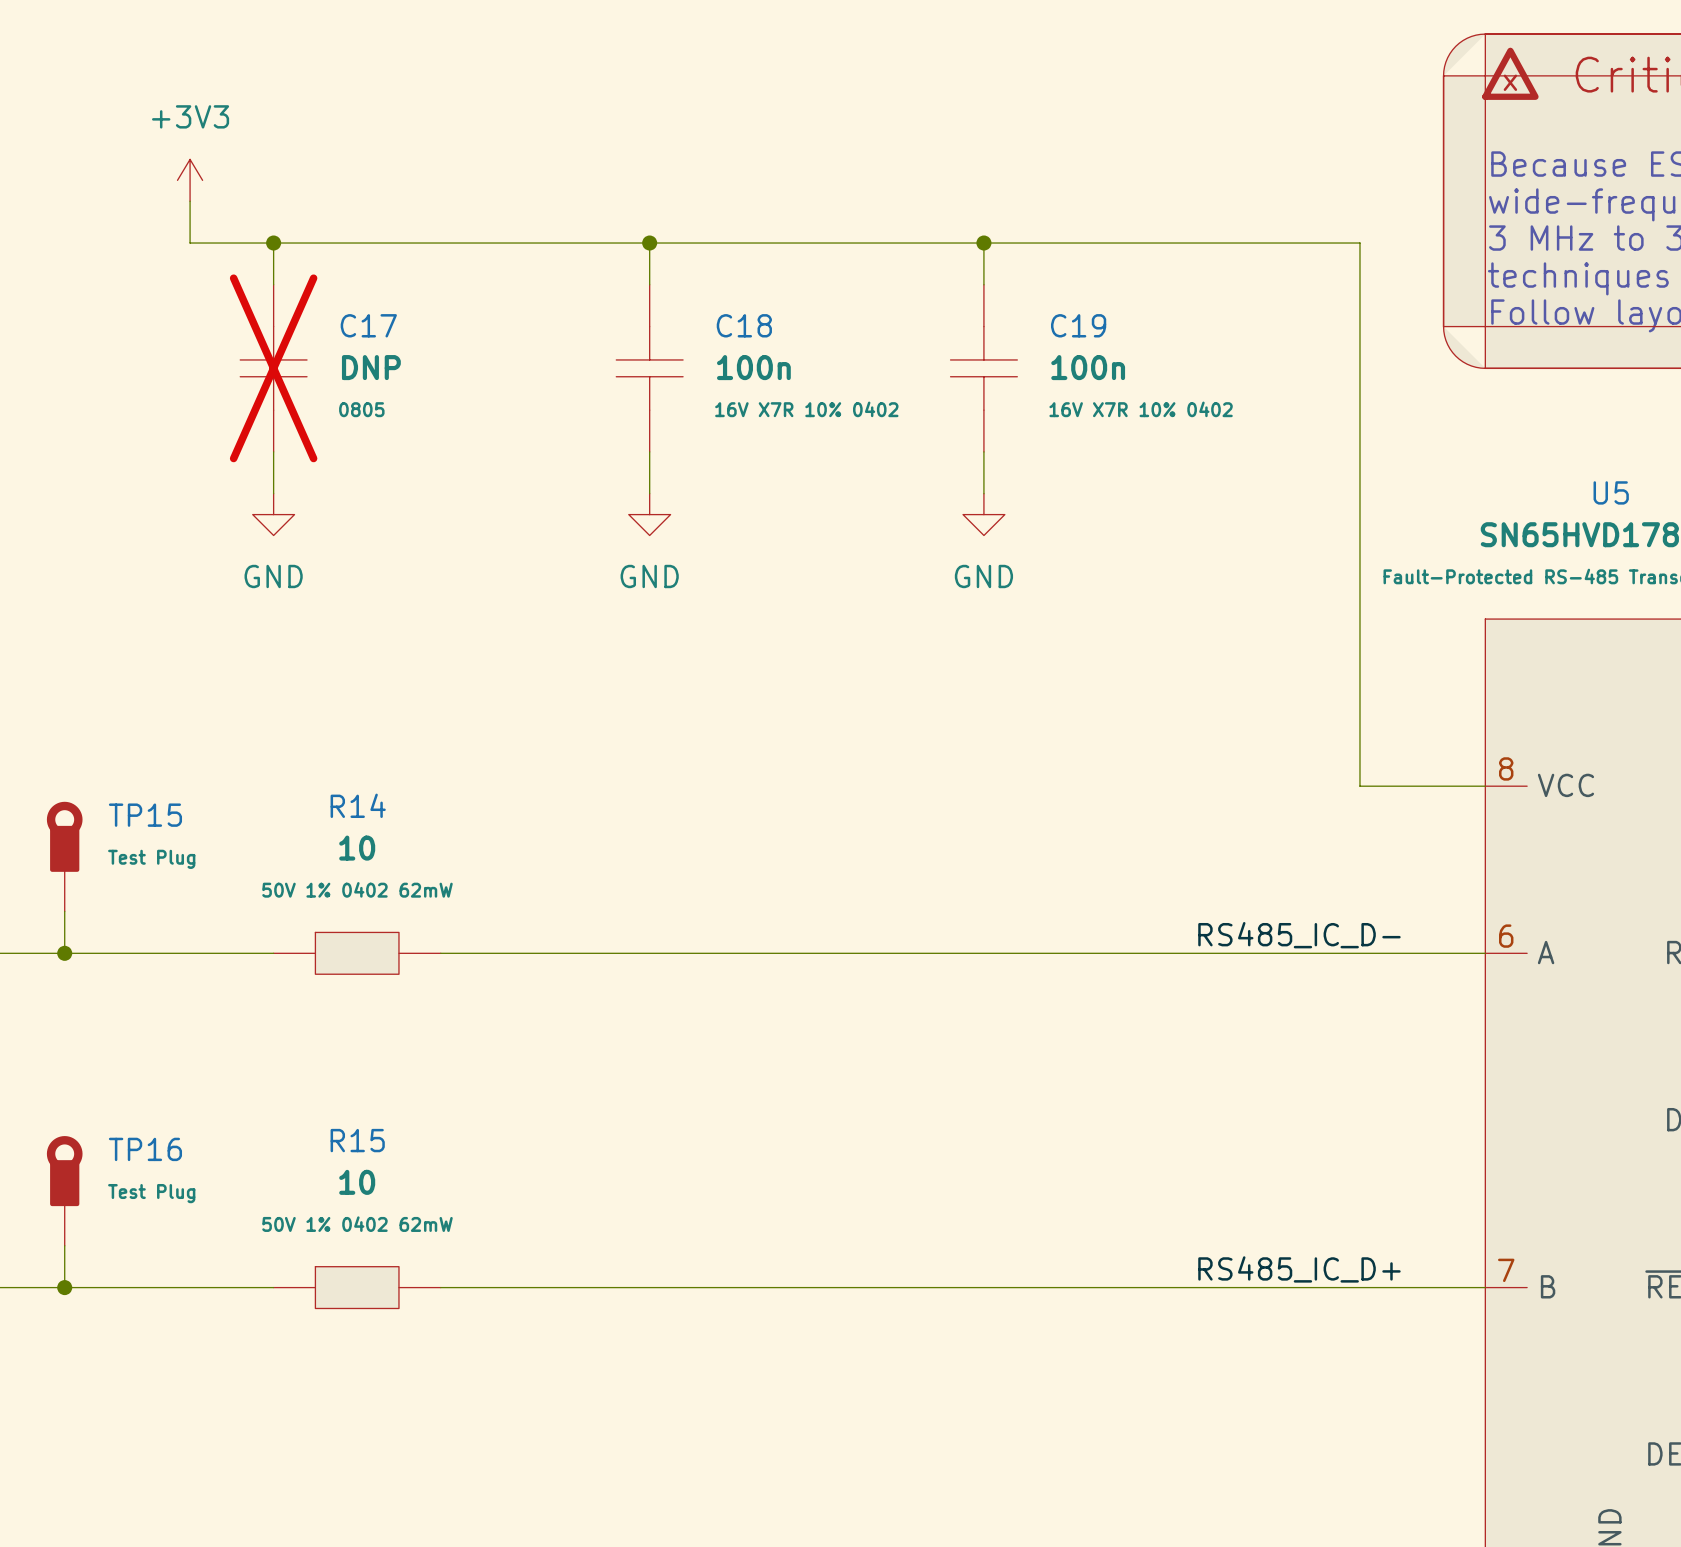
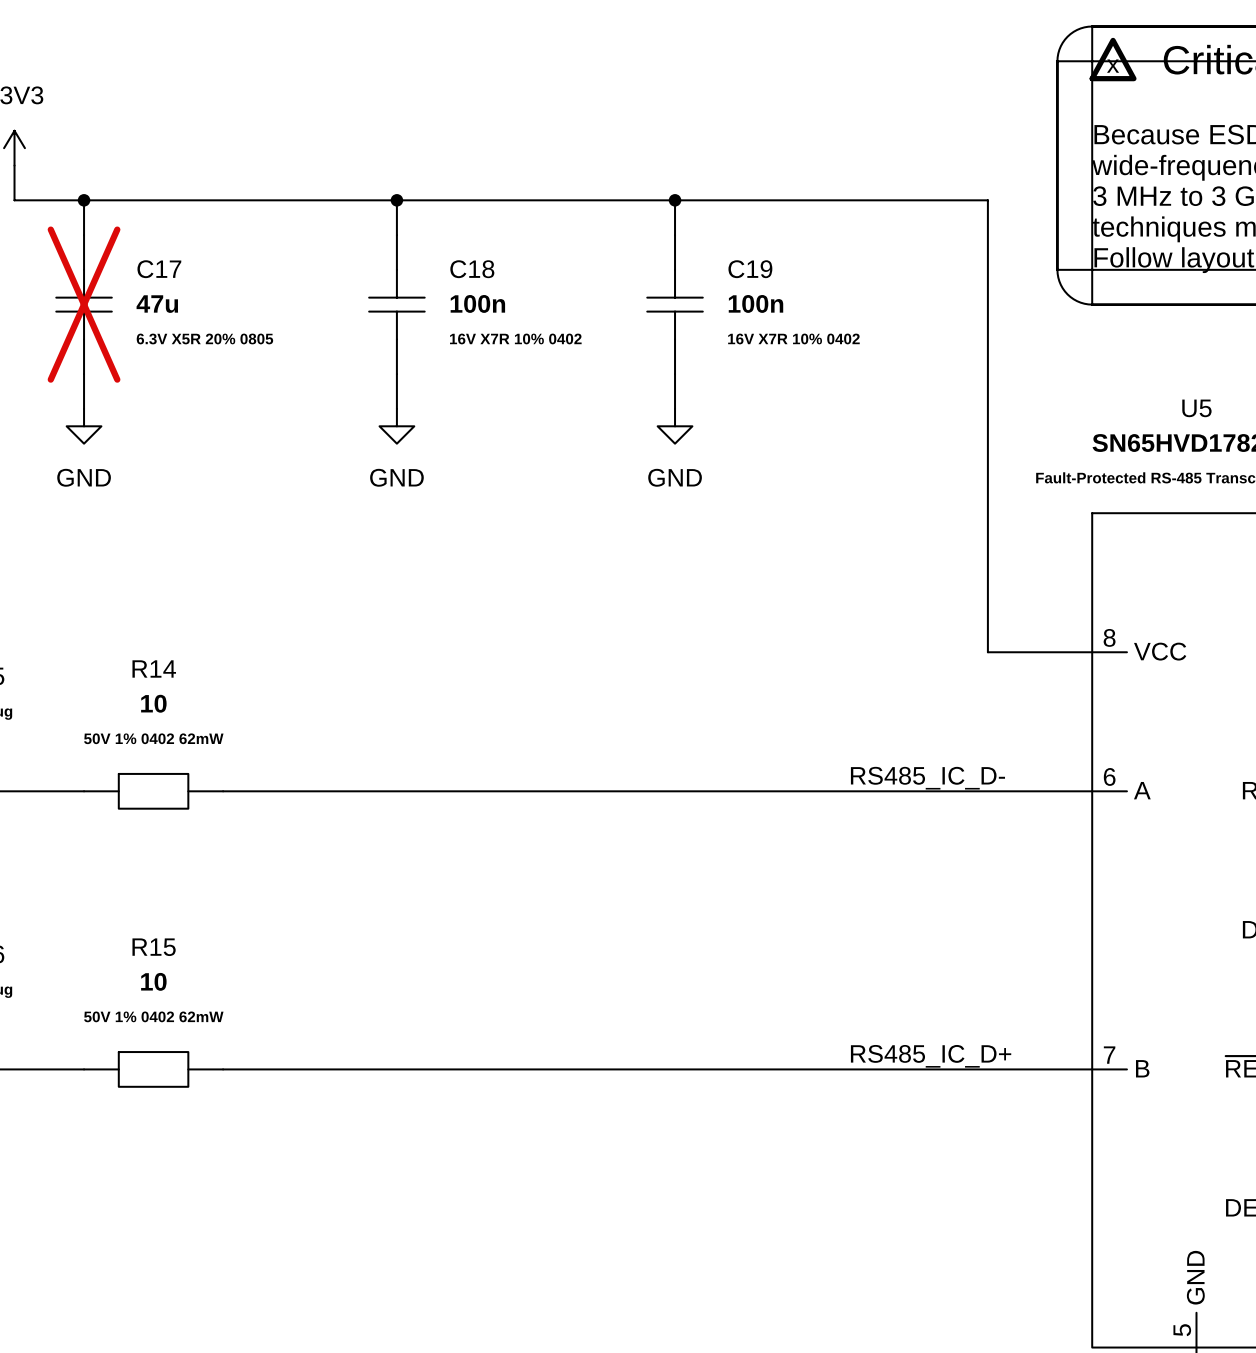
C17 value: DNP (371, 367) -> 47u (157, 304)
C17 text: 0805 (361, 409) -> 6.3V X5R 20% 0805 (204, 338)

